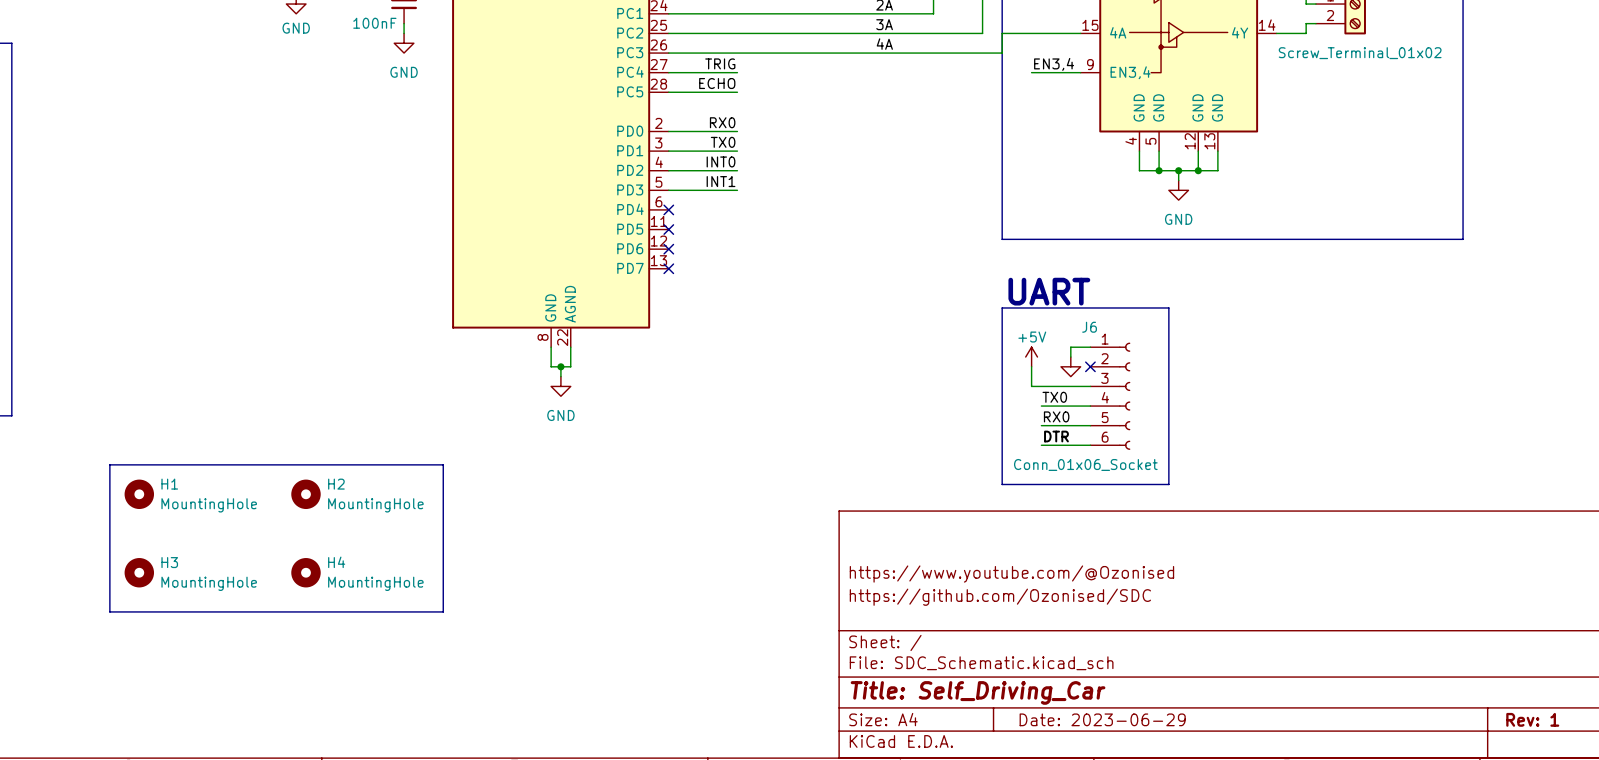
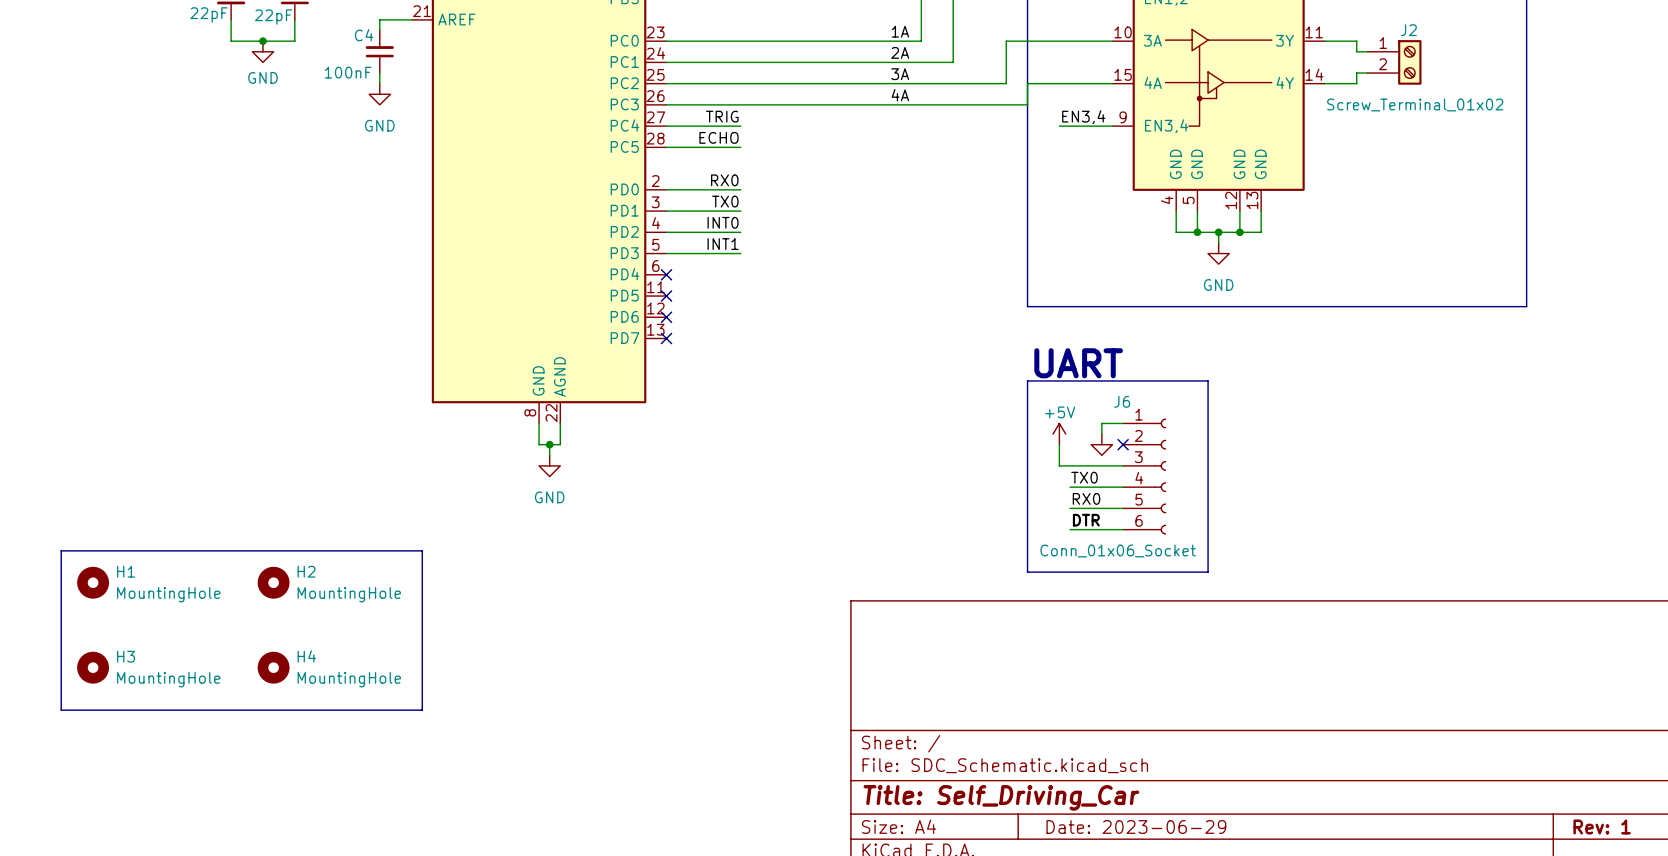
title block: https://www.youtube.com/@Ozonised (1011, 574) -> none
title block: https://github.com/Ozonised/SDC (1000, 597) -> none

